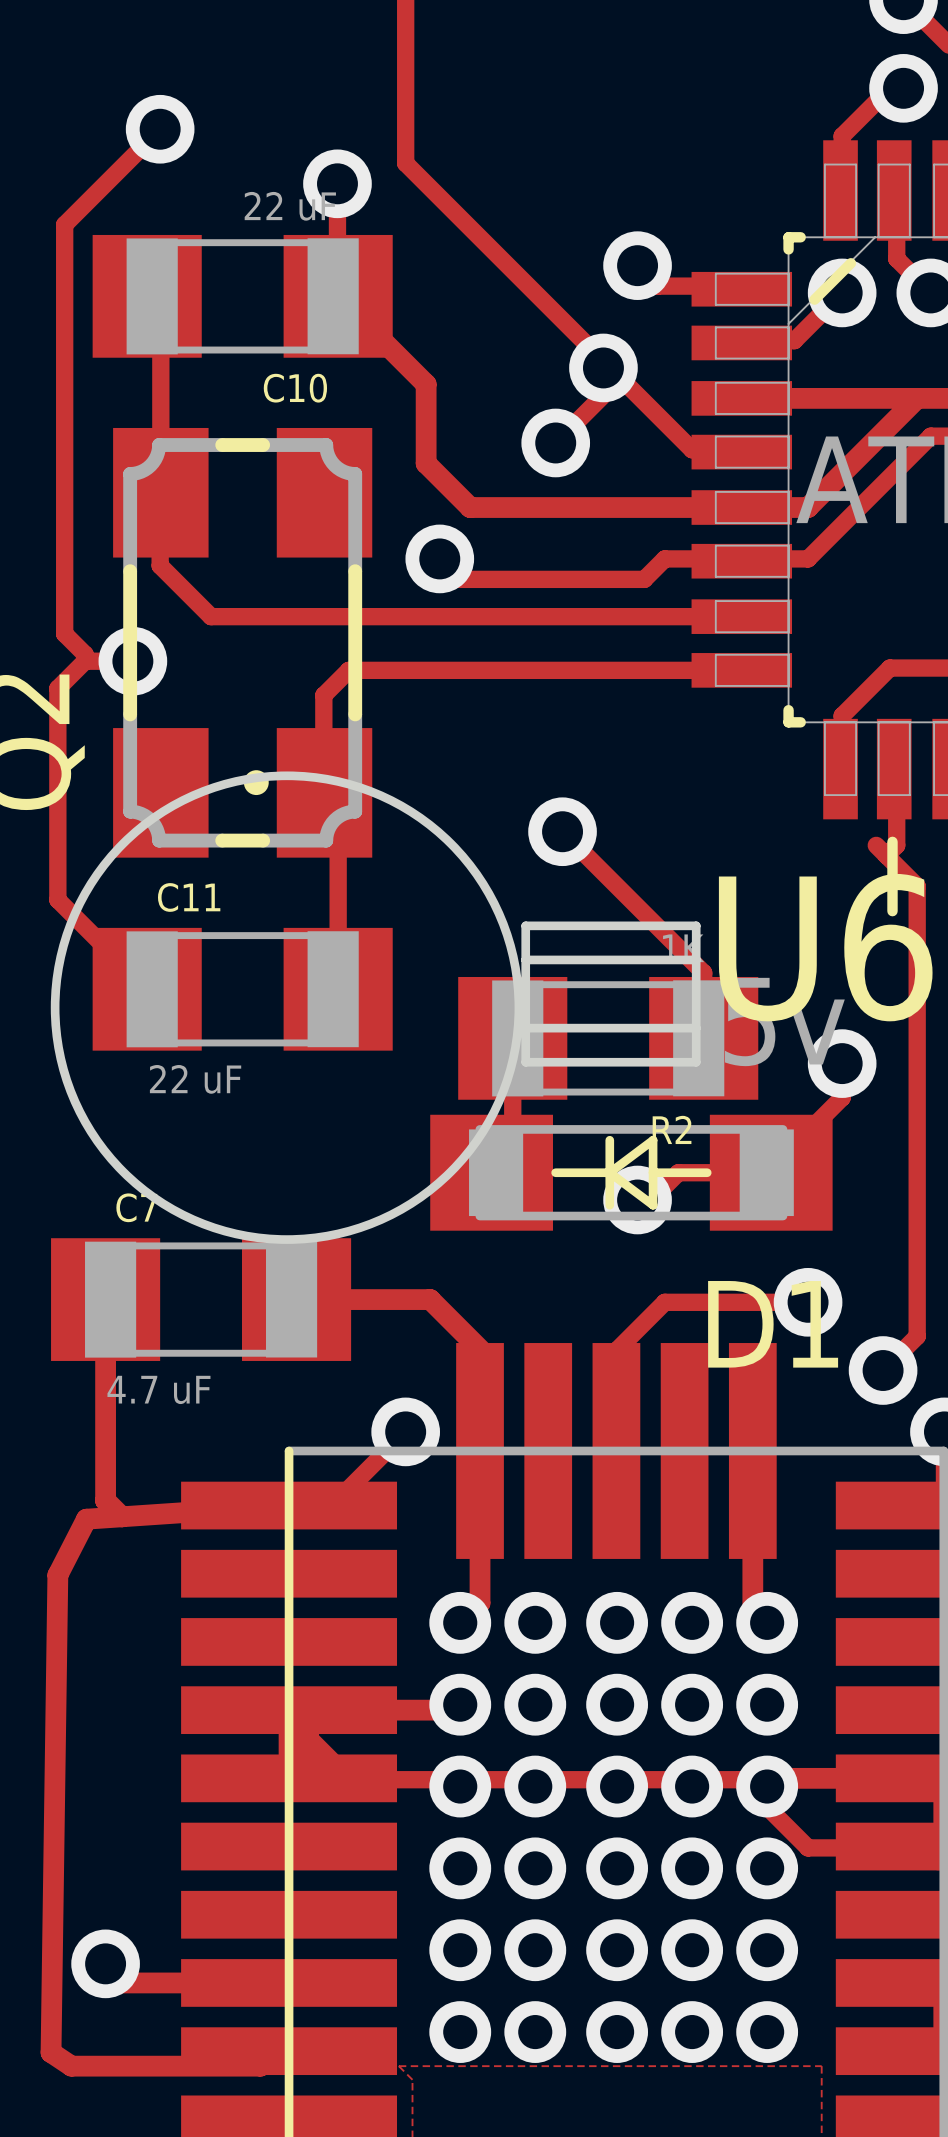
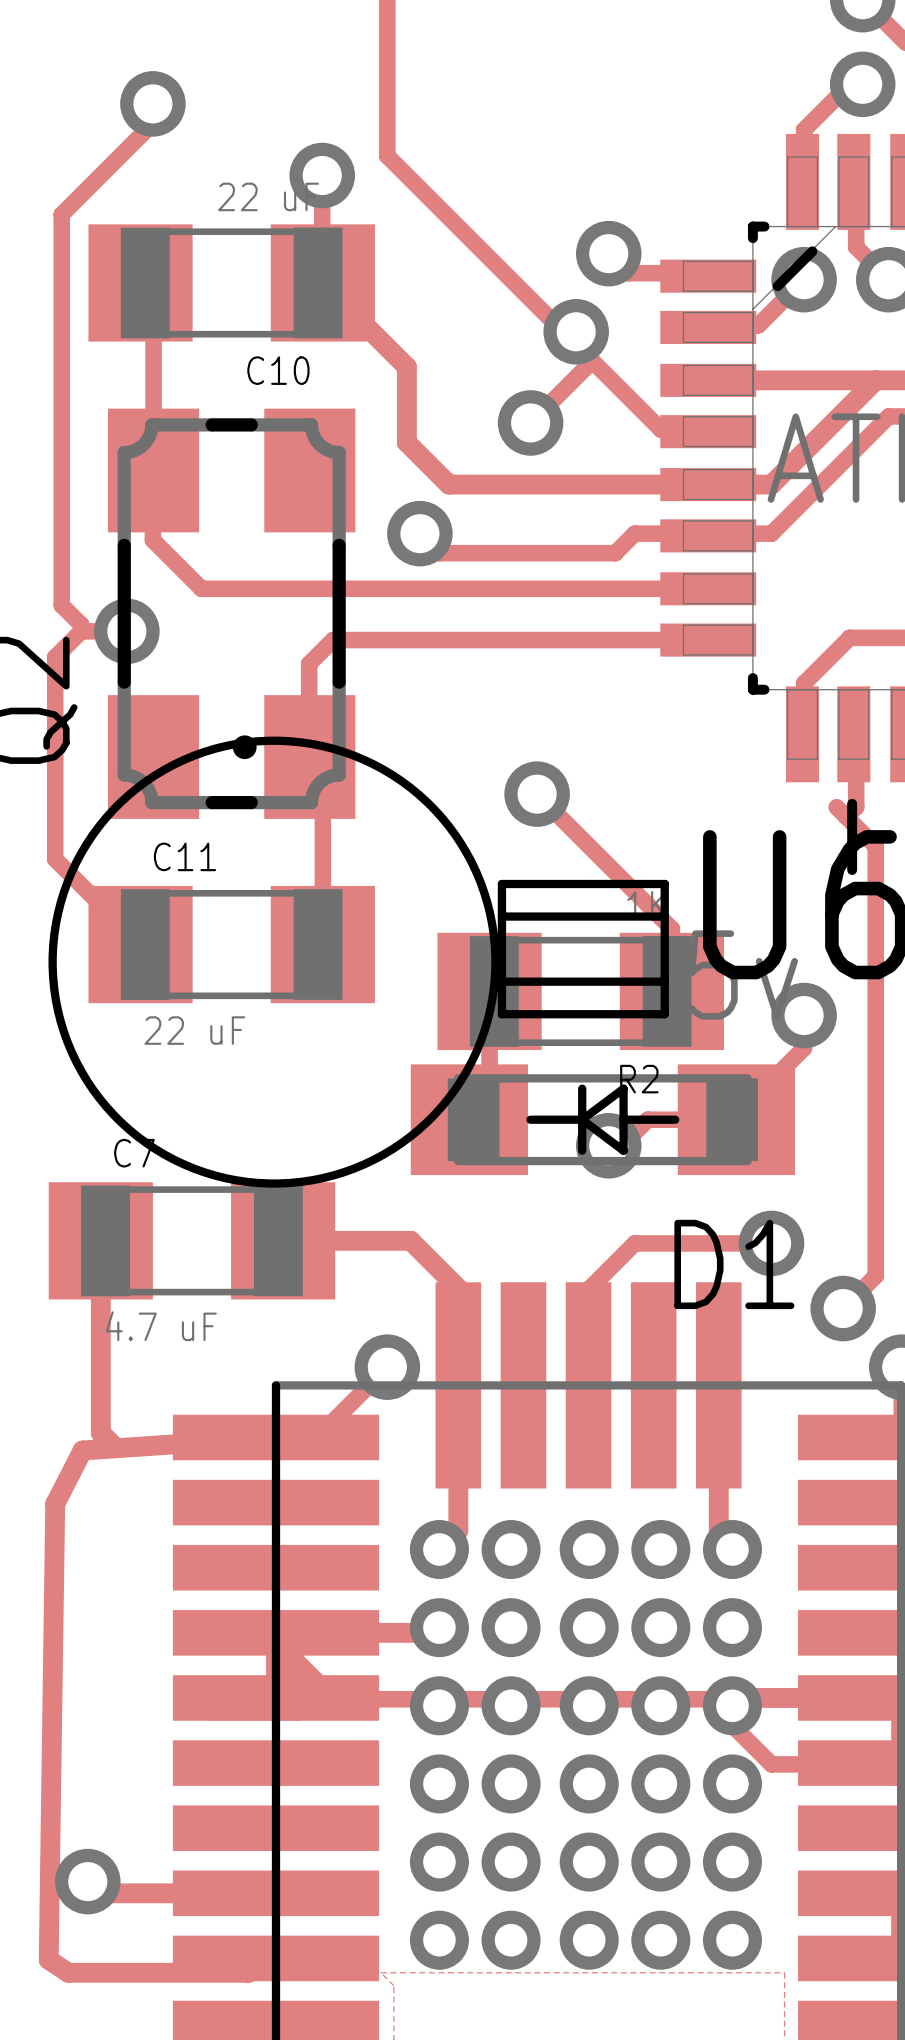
via position: (160, 129) -> (152, 103)
via position: (603, 367) -> (576, 331)
via position: (105, 1963) -> (87, 1881)

